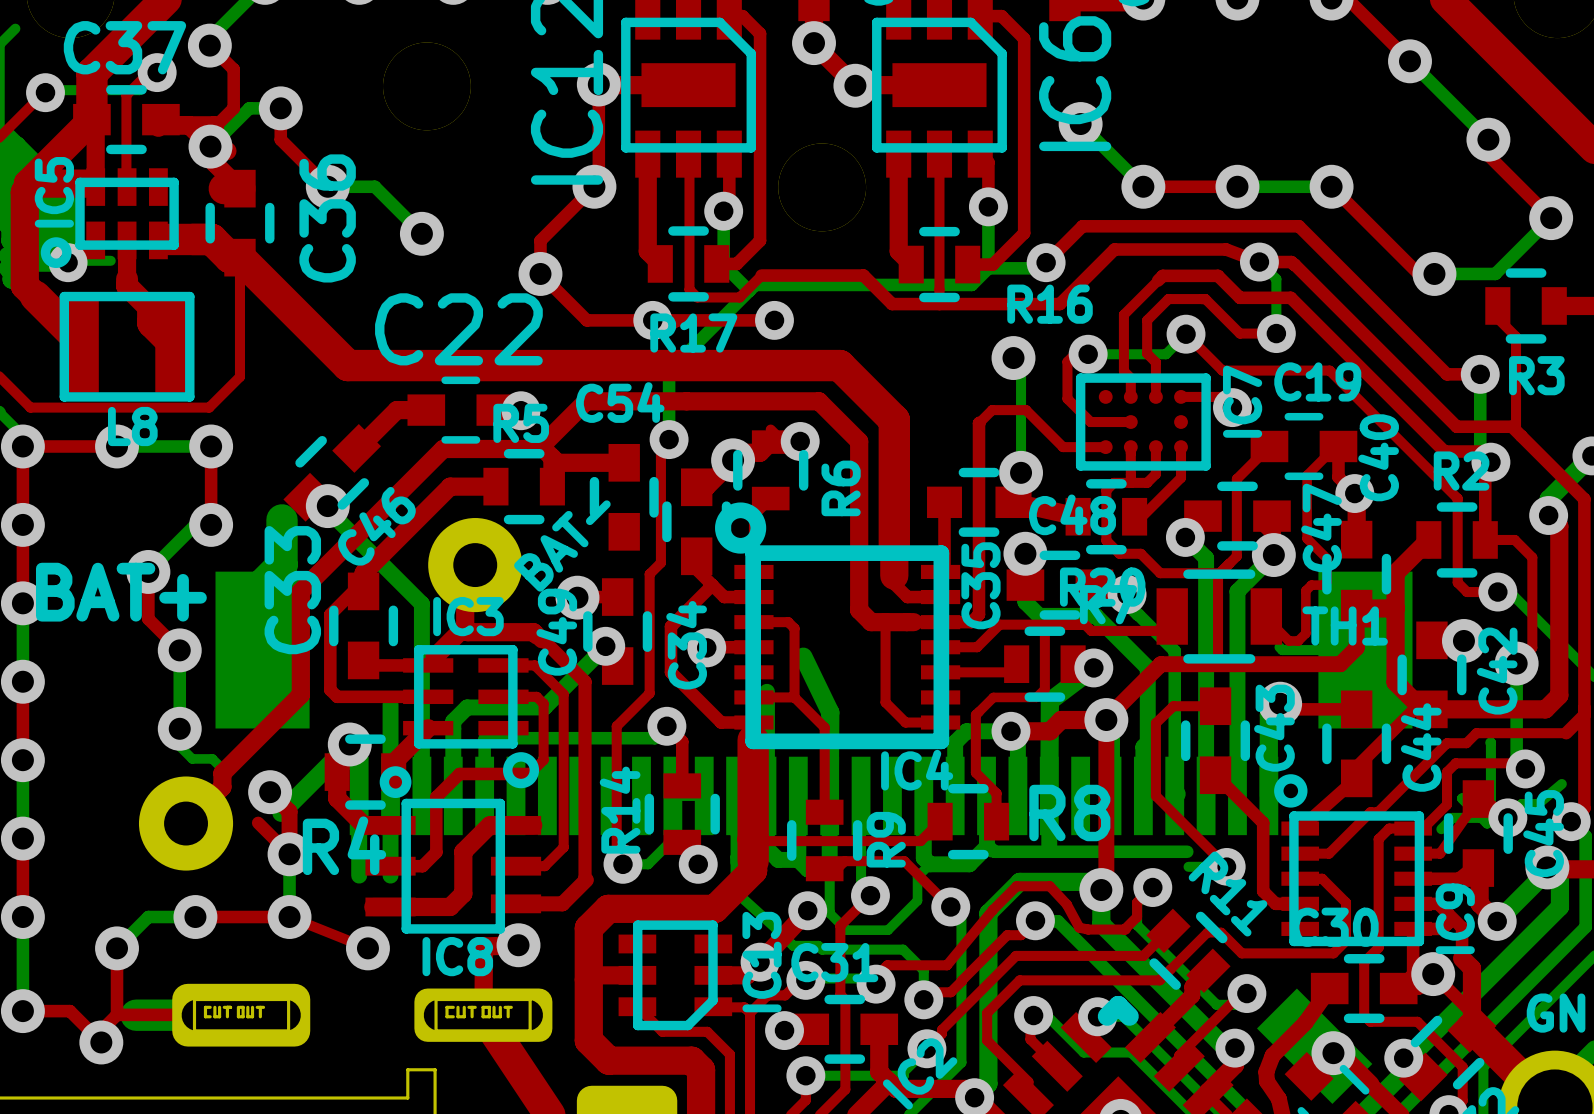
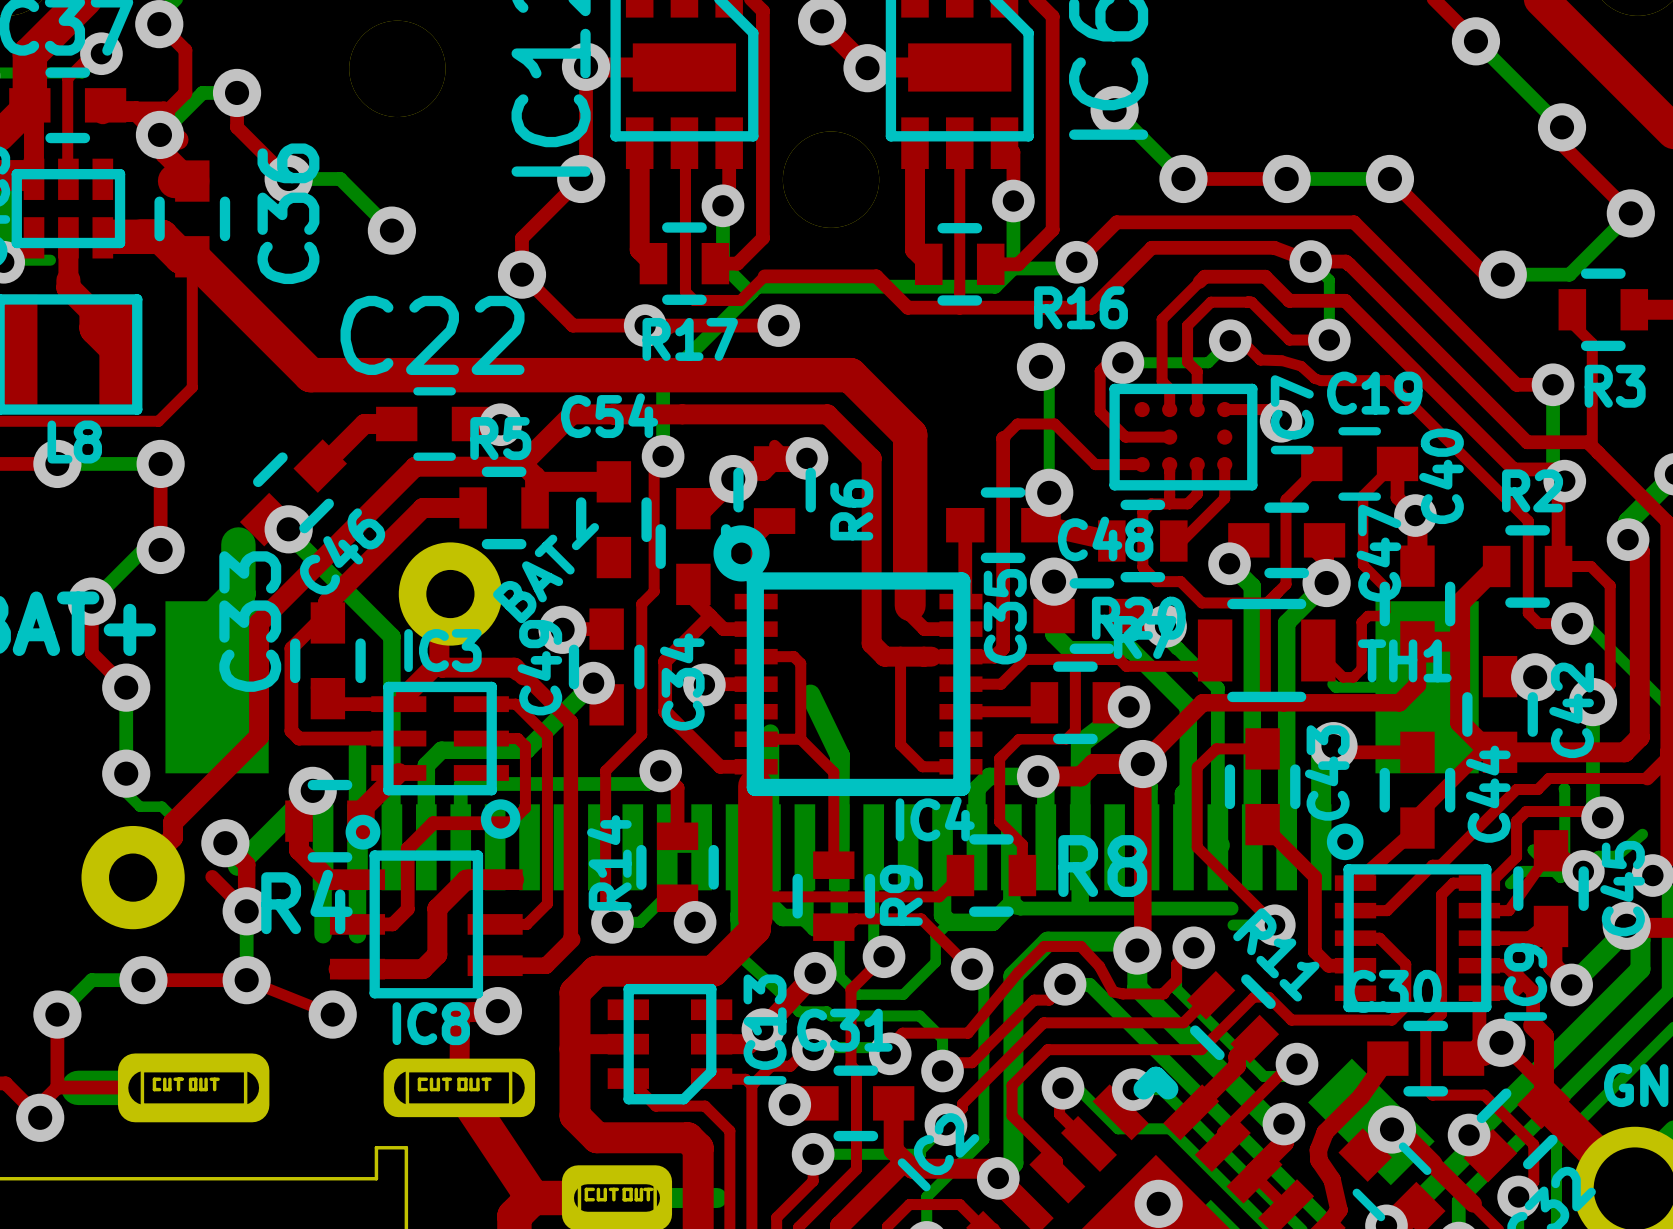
top track: (1186, 334) (1222, 370) (1268, 370) -> (1241, 340) (1260, 360) (1281, 360) (1301, 366) (1314, 378) (1321, 380)

